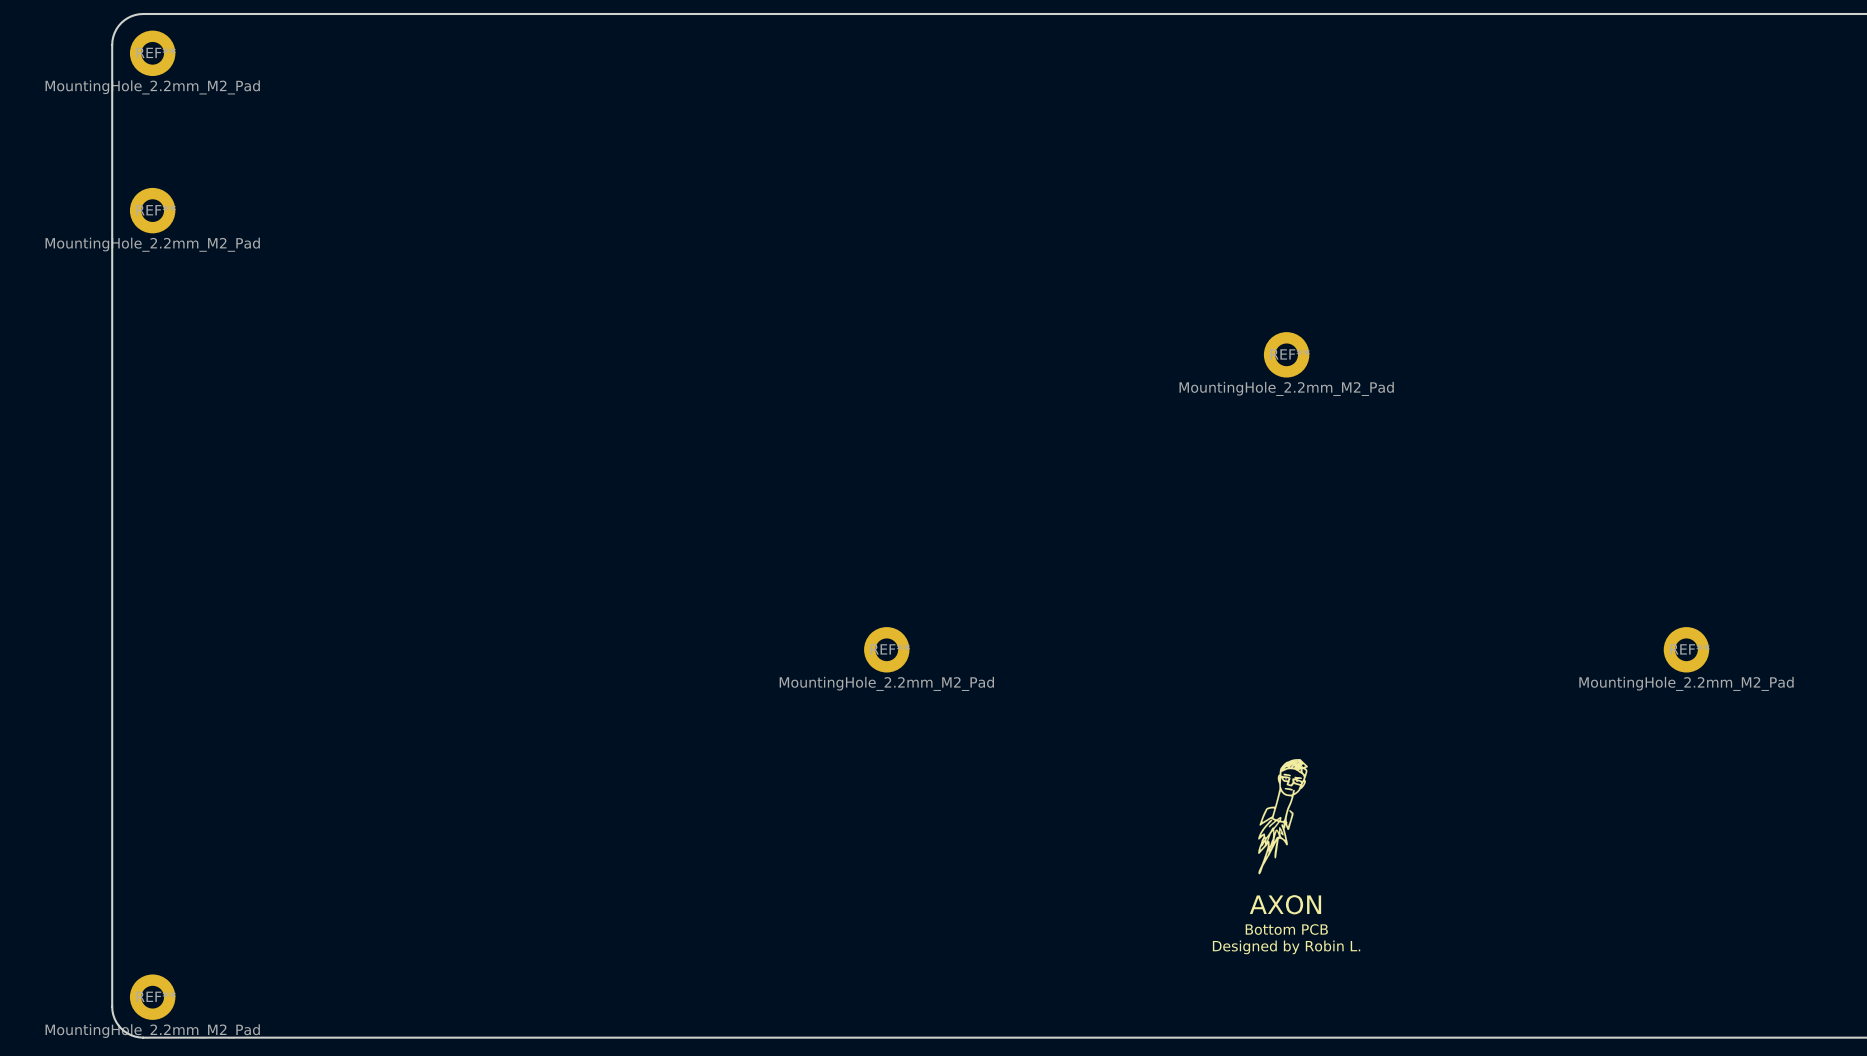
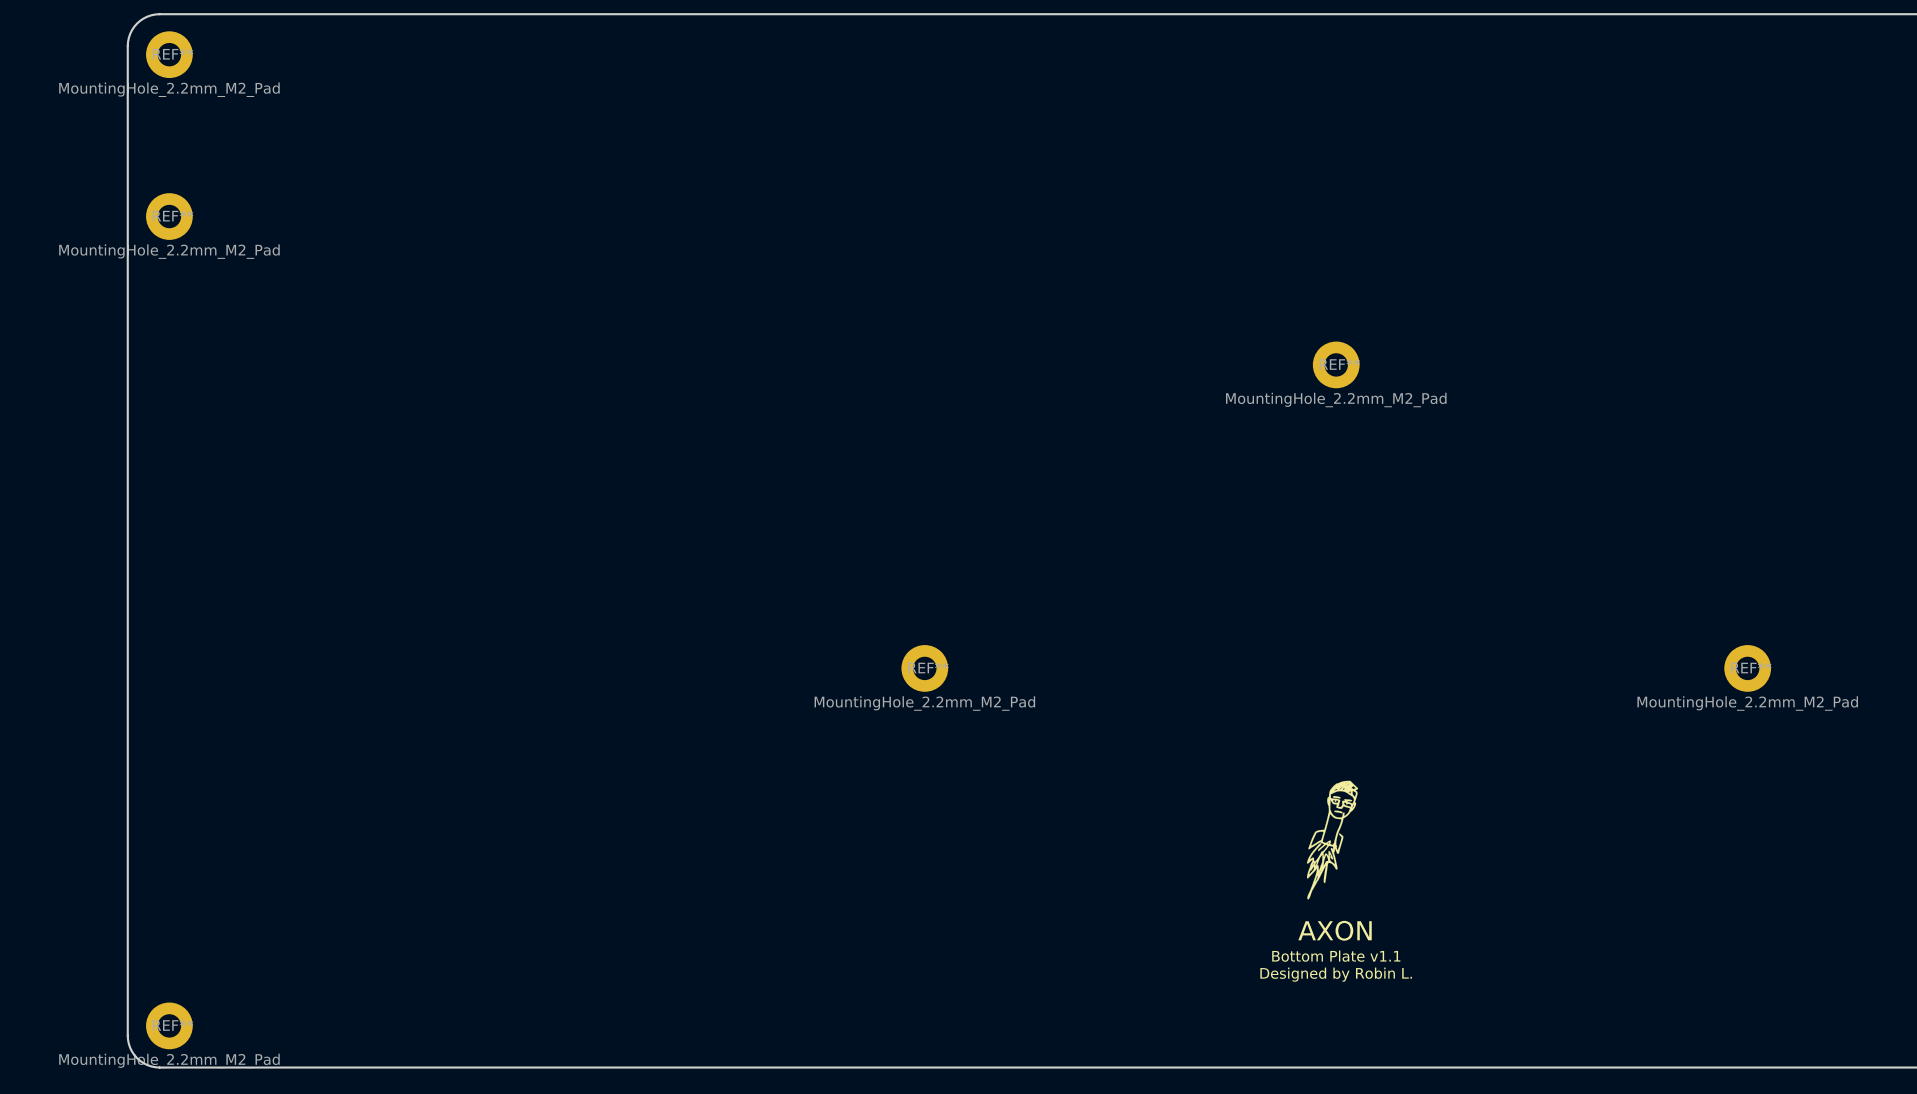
text: Bottom PCB (1286, 929) -> Bottom Plate v1.1 (1336, 956)

